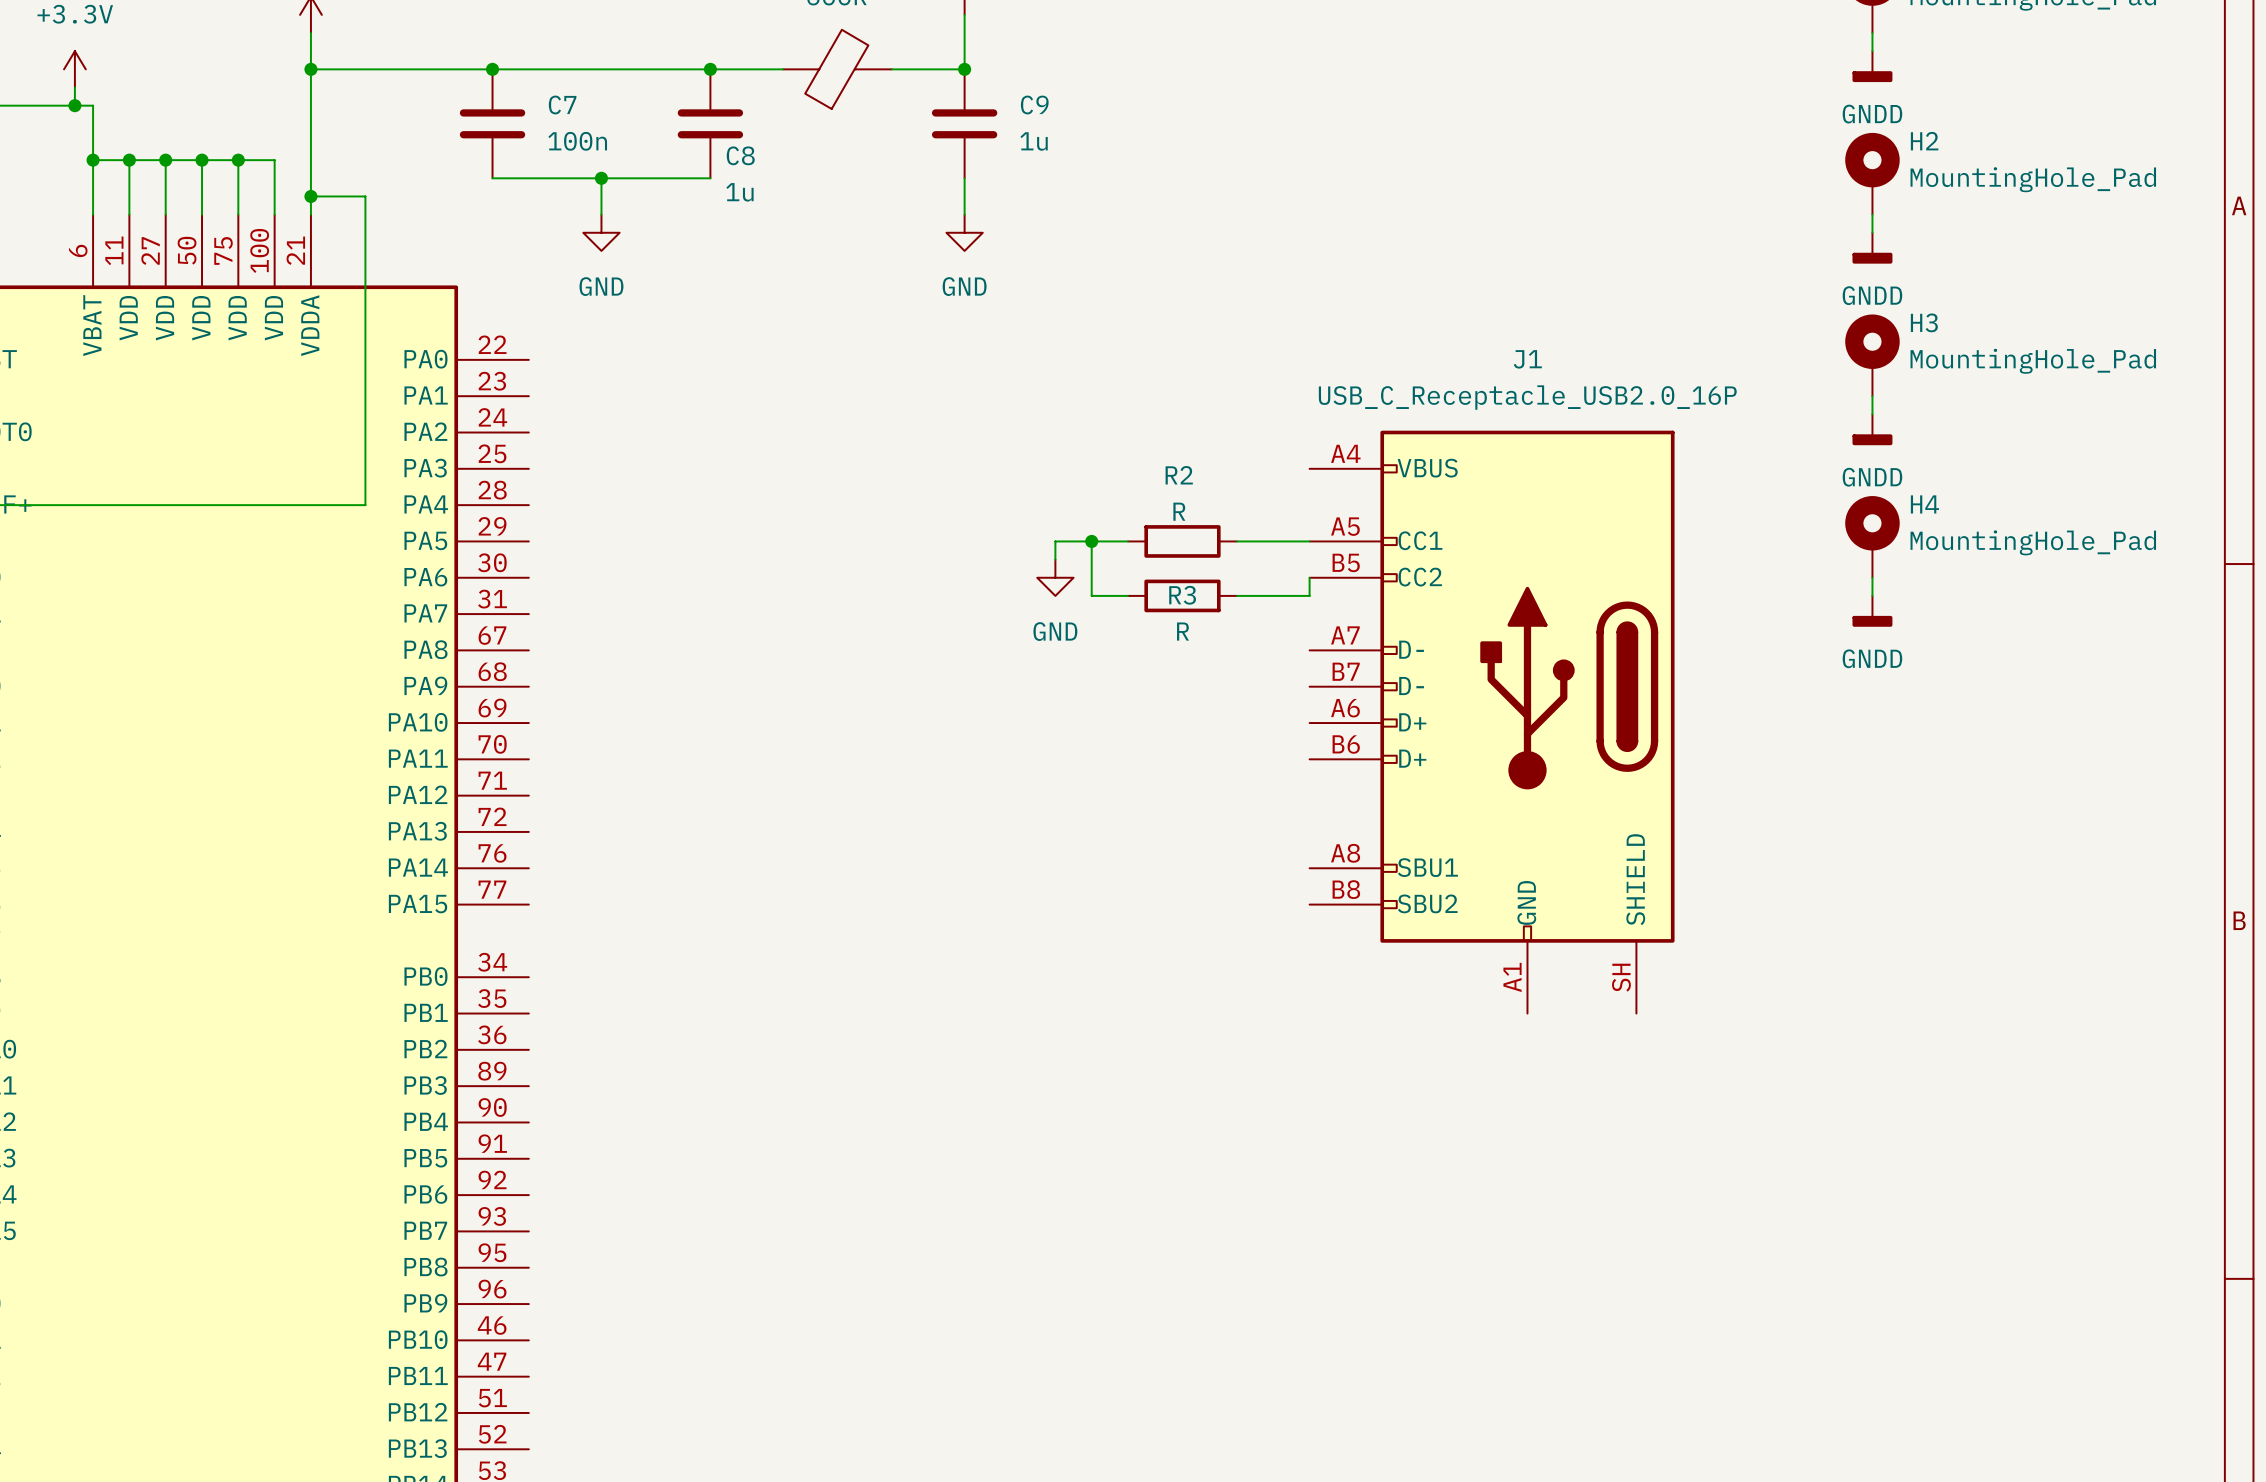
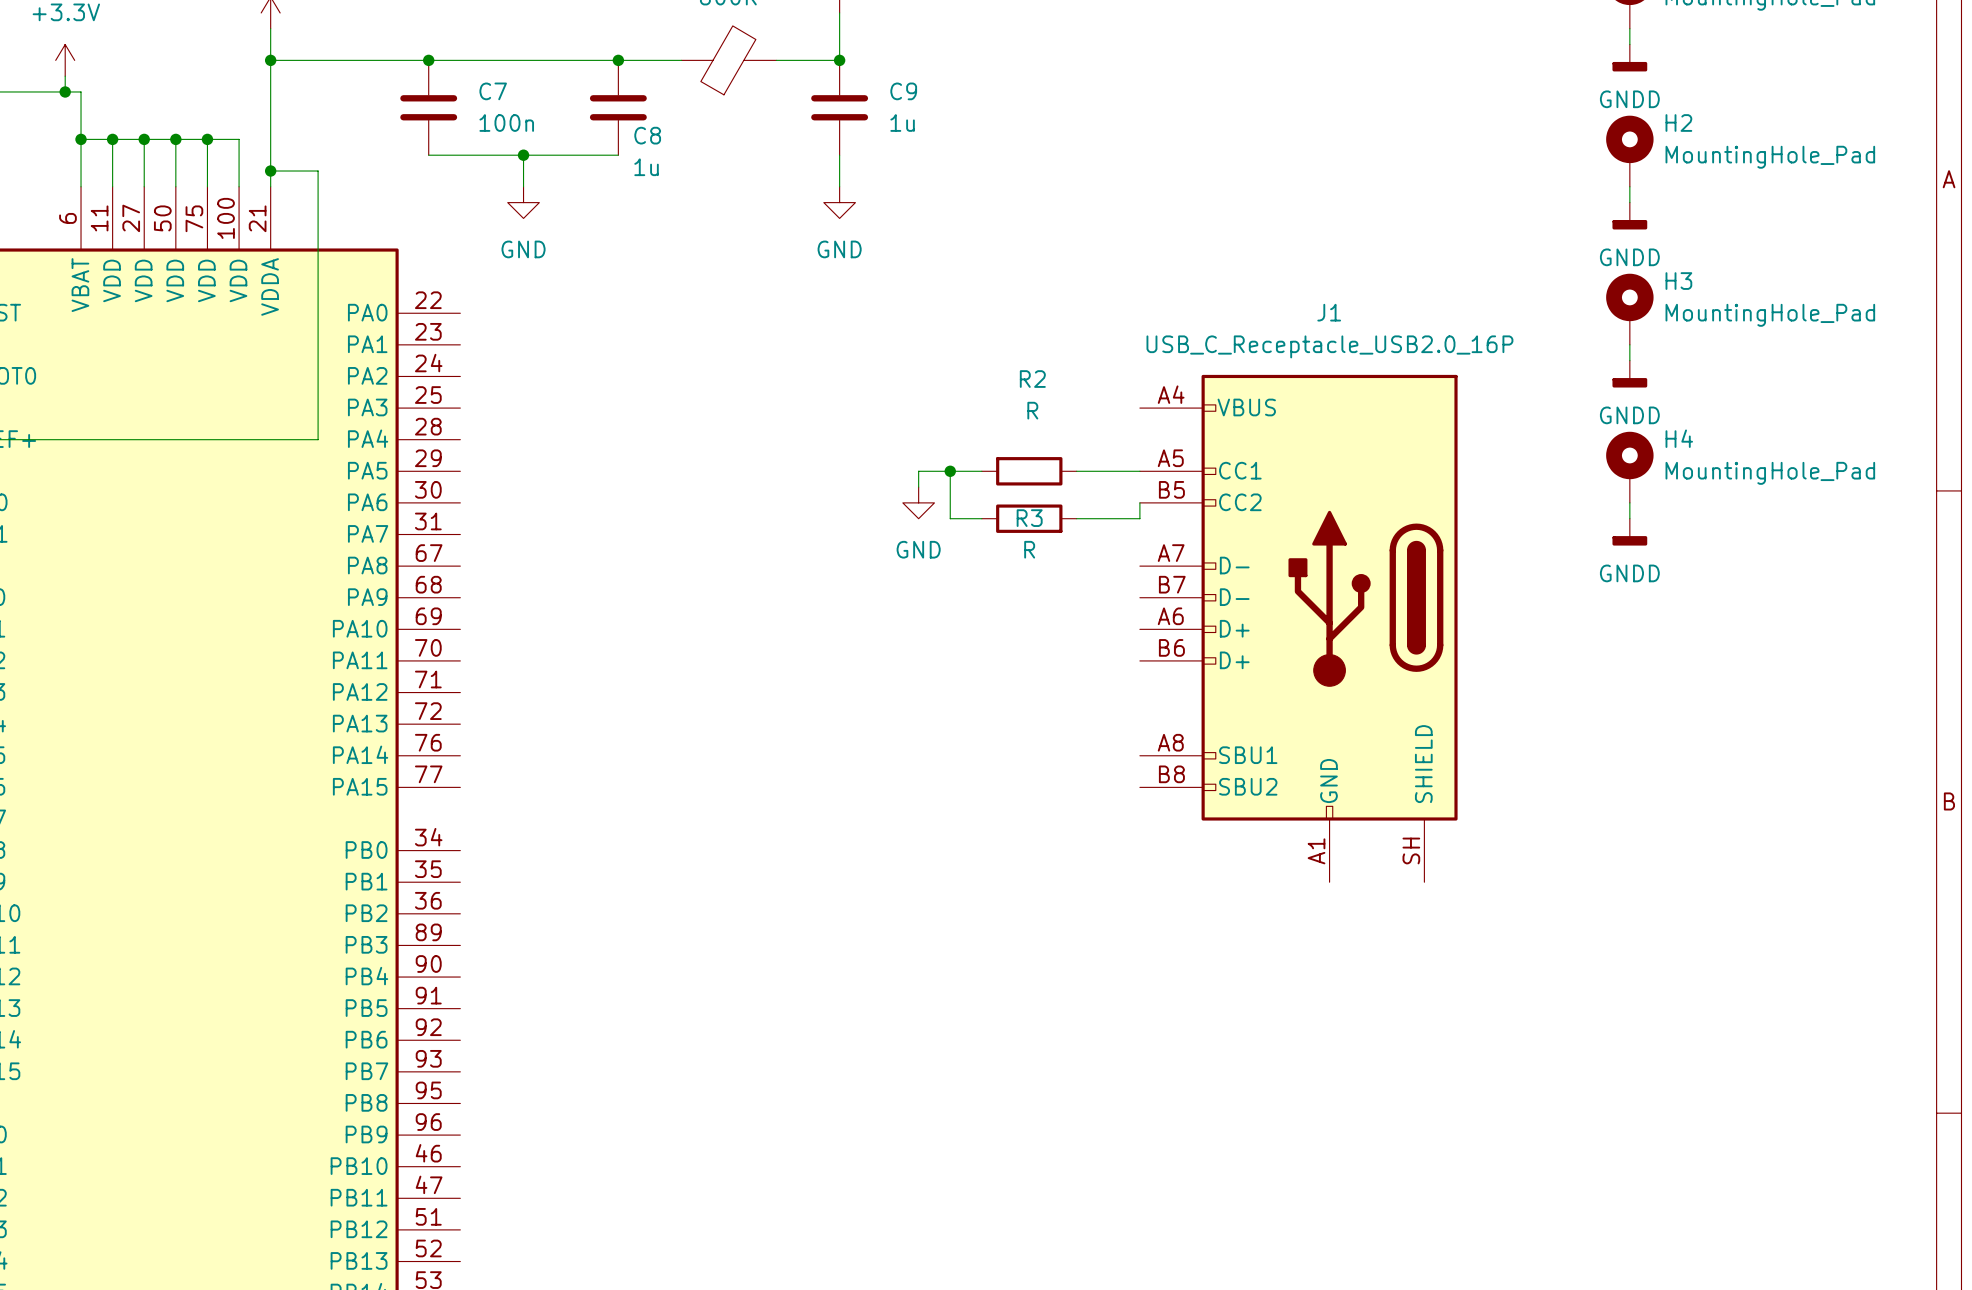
R2 name position: R2 (1179, 475) -> R2 (1032, 379)
R2 value position: R (1179, 511) -> R (1032, 410)

